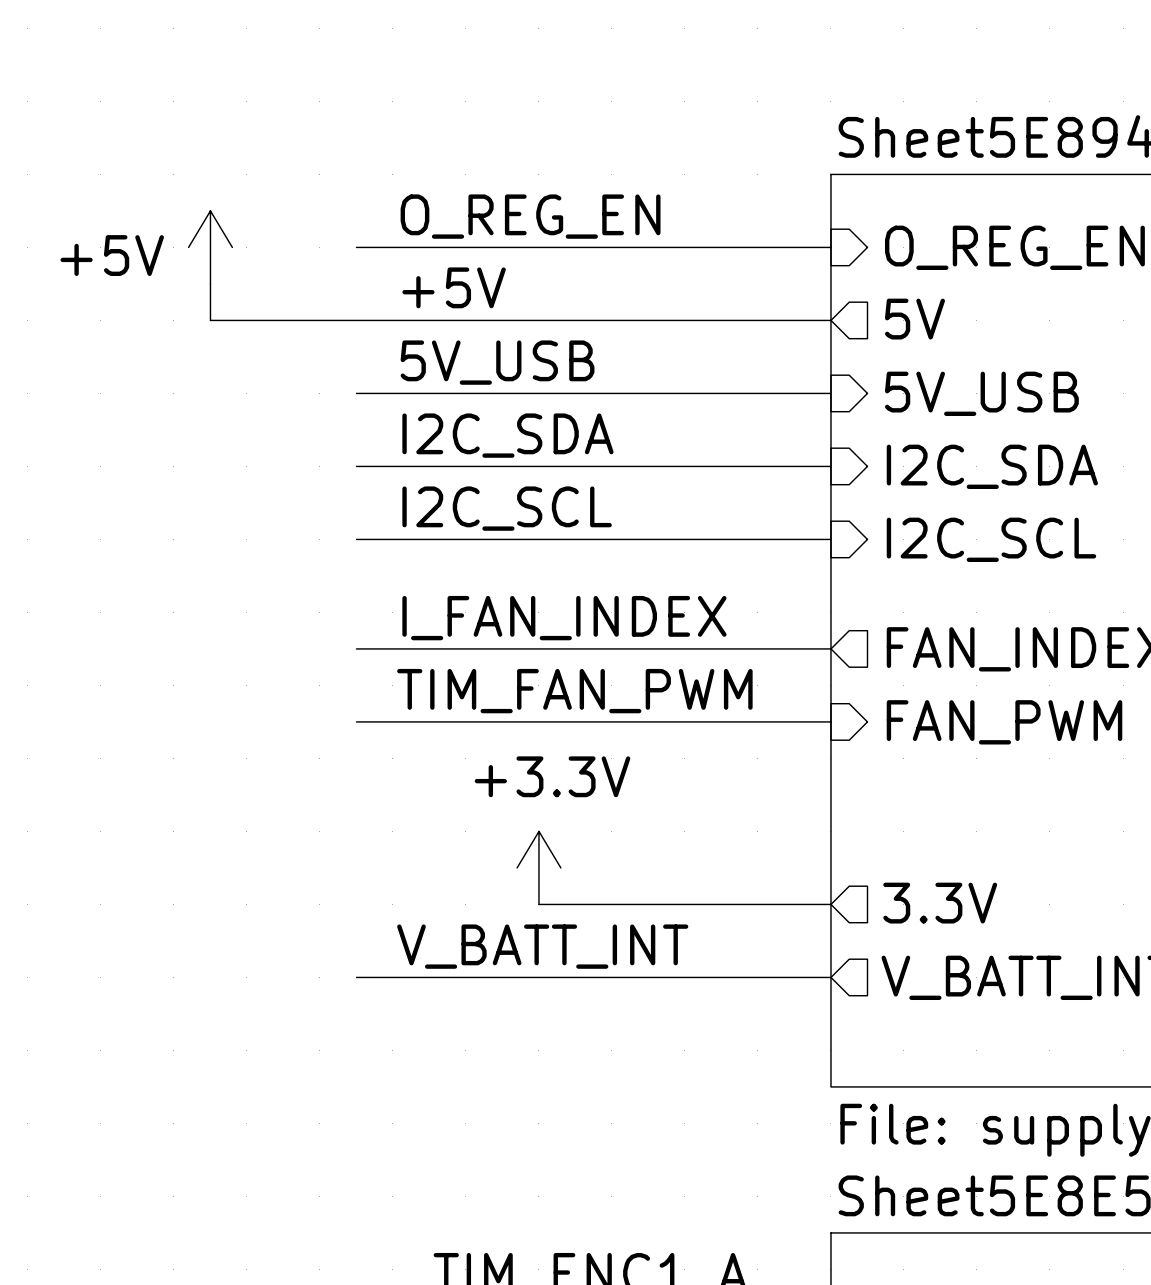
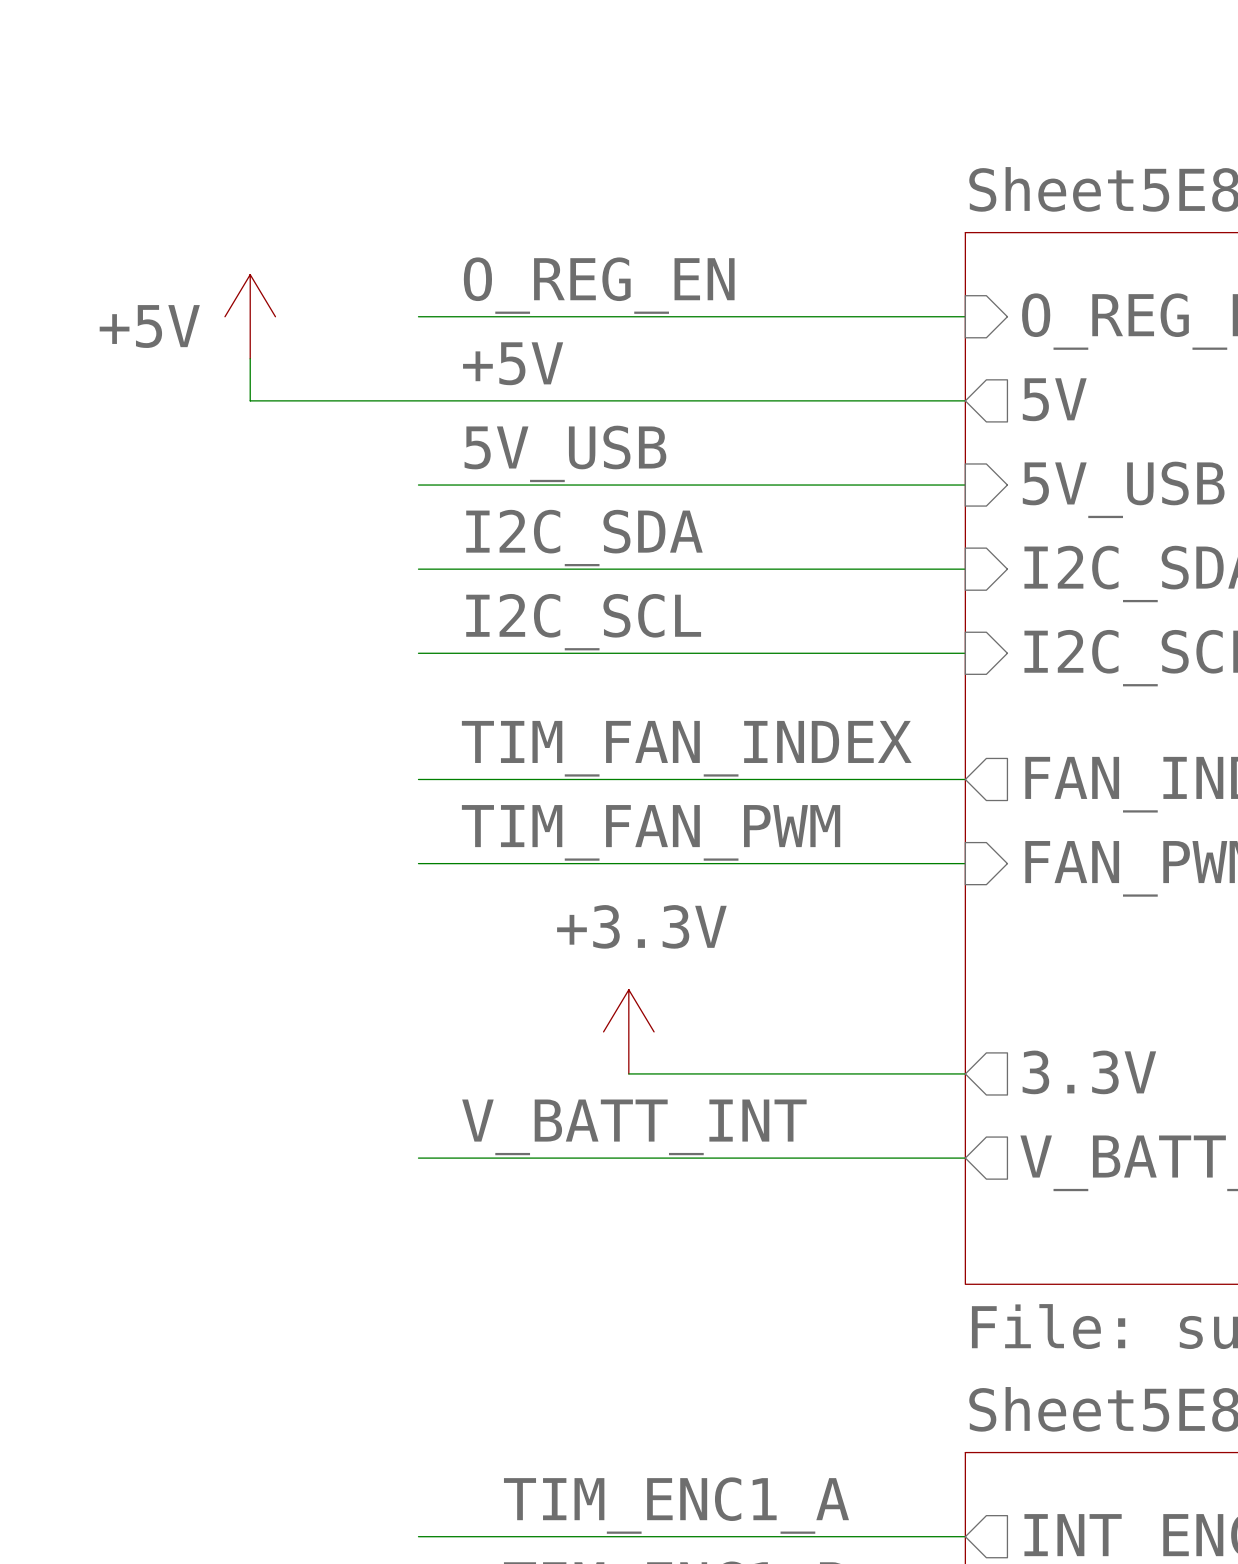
label: I_FAN_INDEX (564, 618) -> TIM_FAN_INDEX (686, 748)

